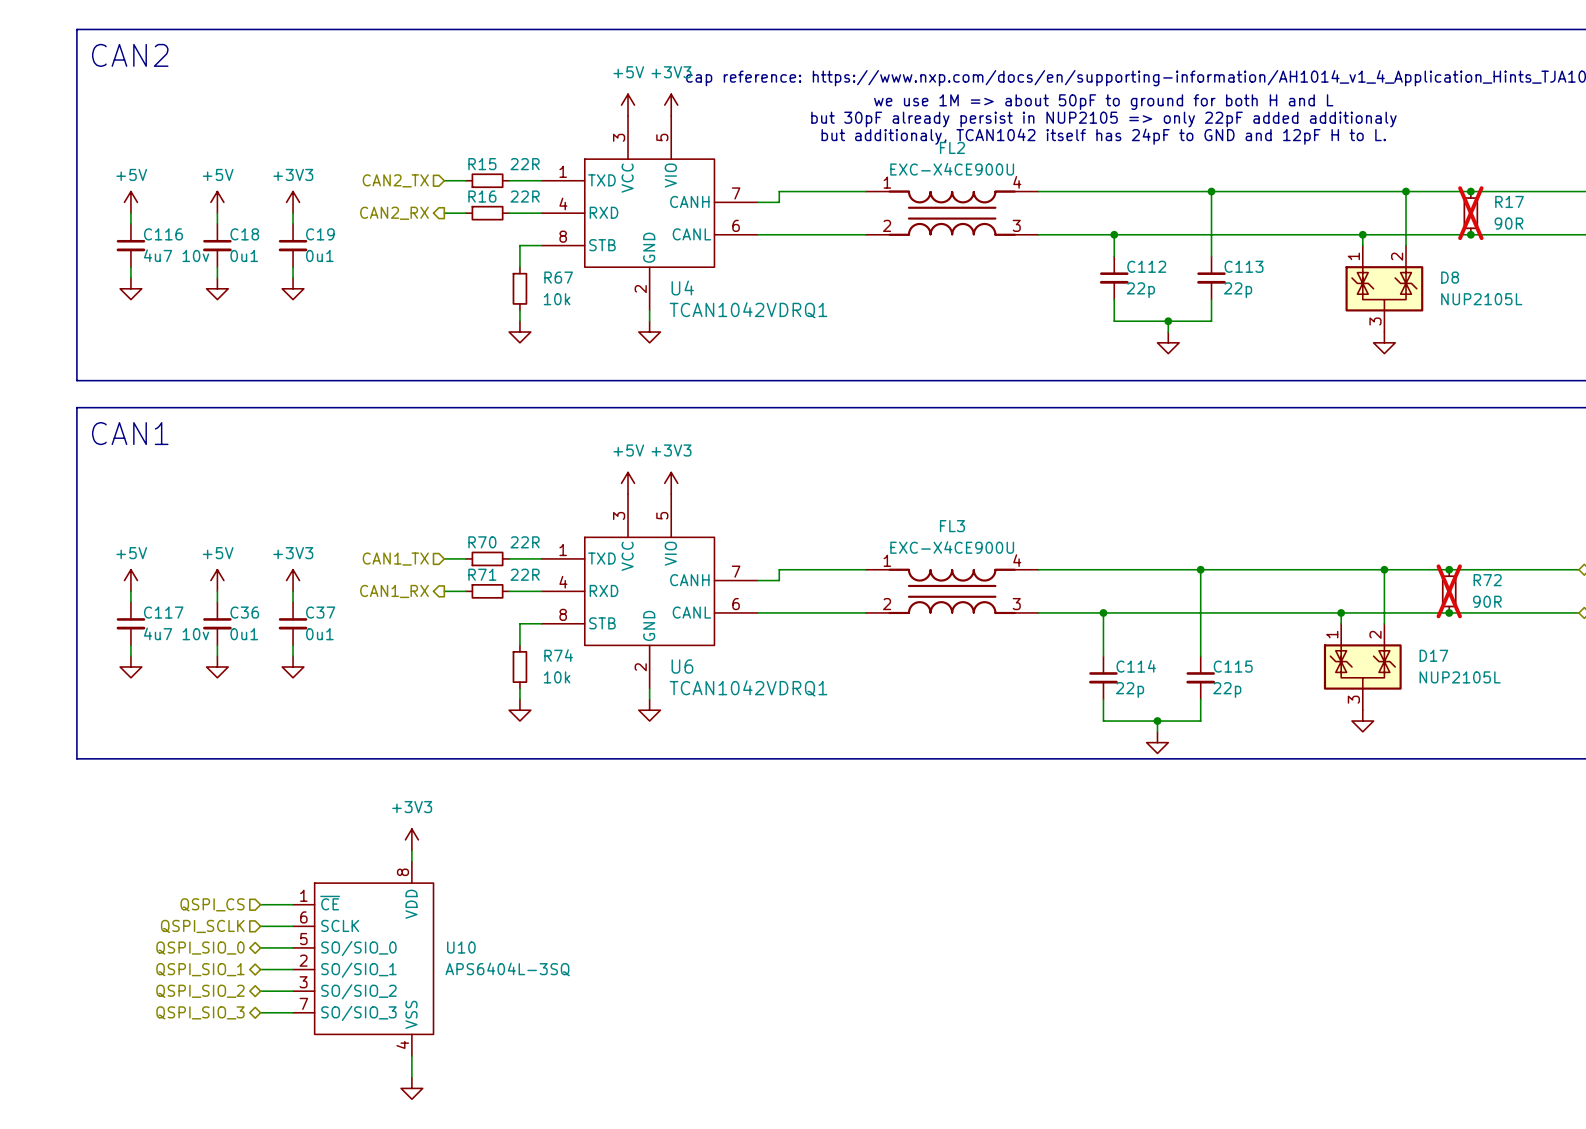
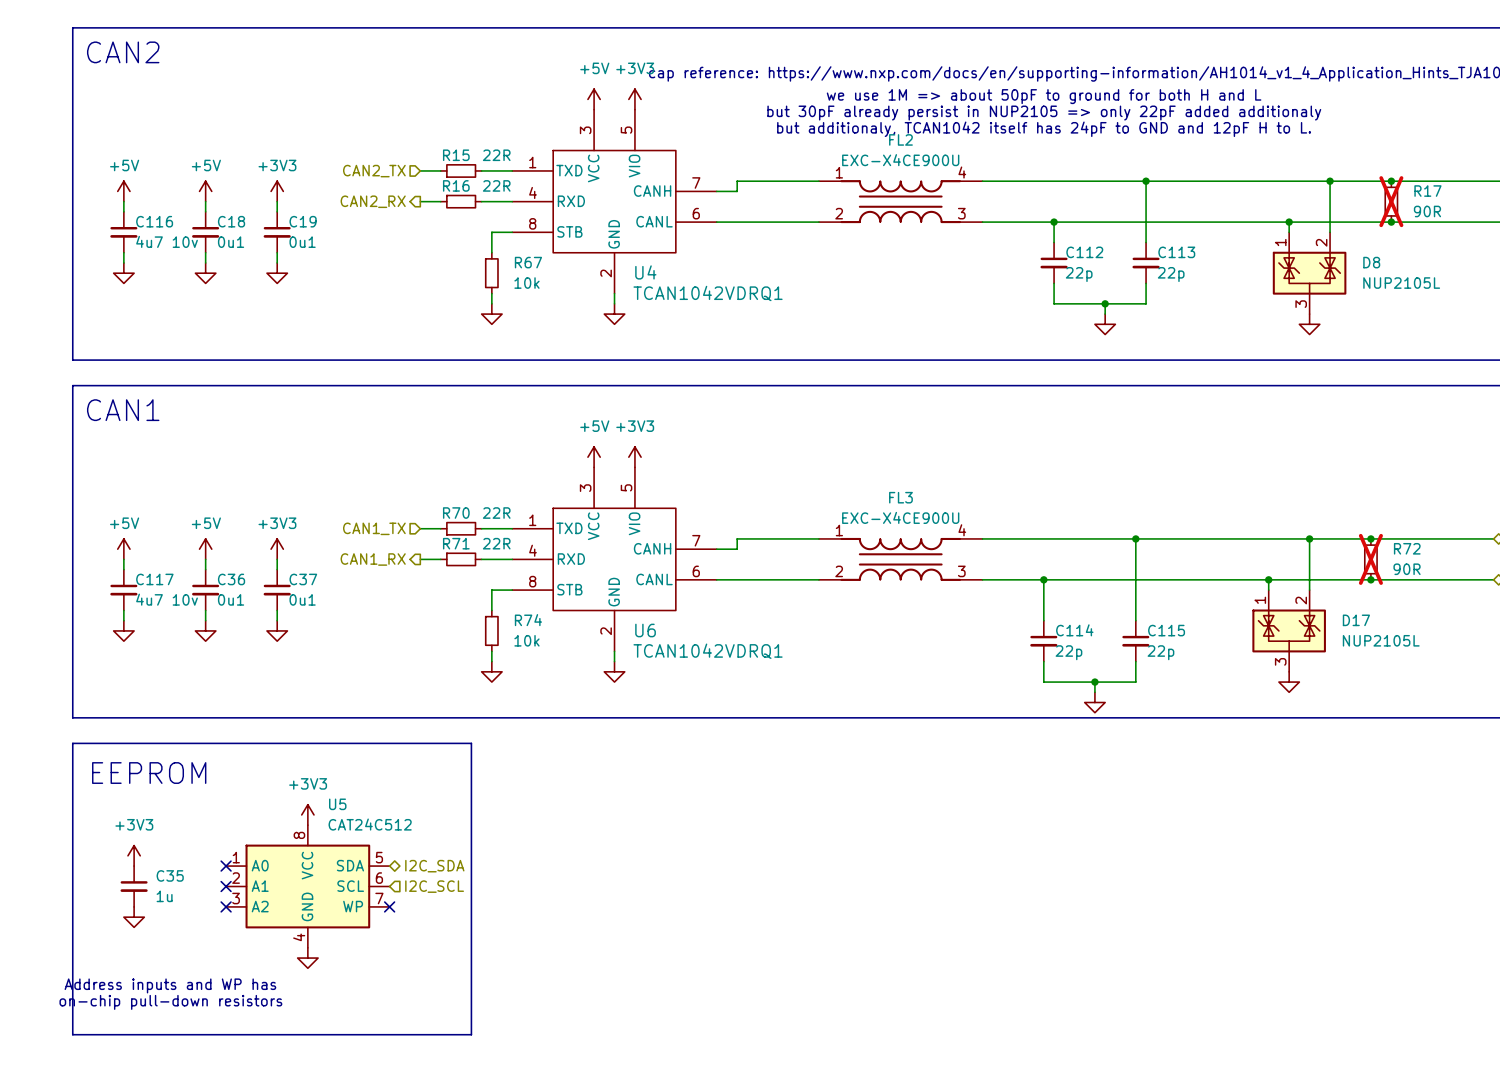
line: none -> (72, 743) (471, 743) (471, 1034) (72, 1034) (72, 743)
text: none -> EEPROM (149, 773)
power symbol position: +3V3 (411, 839) -> +3V3 (307, 814)
wire: (411, 850) (411, 861) -> none
power symbol: none -> +3V3 (134, 855)
hierarchical label: QSPI_CS (212, 904) -> none
no-connect mark: none -> (226, 866)
hierarchical label: none -> I2C_SDA (434, 866)
hierarchical label: QSPI_SCLK (202, 926) -> none
C35: none -> 1u (134, 886)
no-connect mark: none -> (226, 886)
U5: none -> CAT24C512 (307, 886)
hierarchical label: none -> I2C_SCL (434, 886)
hierarchical label: QSPI_SIO_0 (200, 948) -> none
no-connect mark: none -> (226, 906)
U10: APS6404L-3SQ (363, 958) -> none
no-connect mark: none -> (389, 906)
power symbol: none -> (134, 917)
hierarchical label: QSPI_SIO_1 (200, 969) -> none
hierarchical label: QSPI_SIO_2 (200, 991) -> none
wire: (260, 991) (293, 991) -> none
hierarchical label: QSPI_SIO_3 (200, 1012) -> none
wire: (260, 1012) (293, 1012) -> none
text: none -> Address inputs and WP has (170, 985)
wire: (411, 1056) (411, 1077) -> none
text: none -> on-chip pull-down resistors (170, 1002)
power symbol position: (411, 1088) -> (307, 958)

